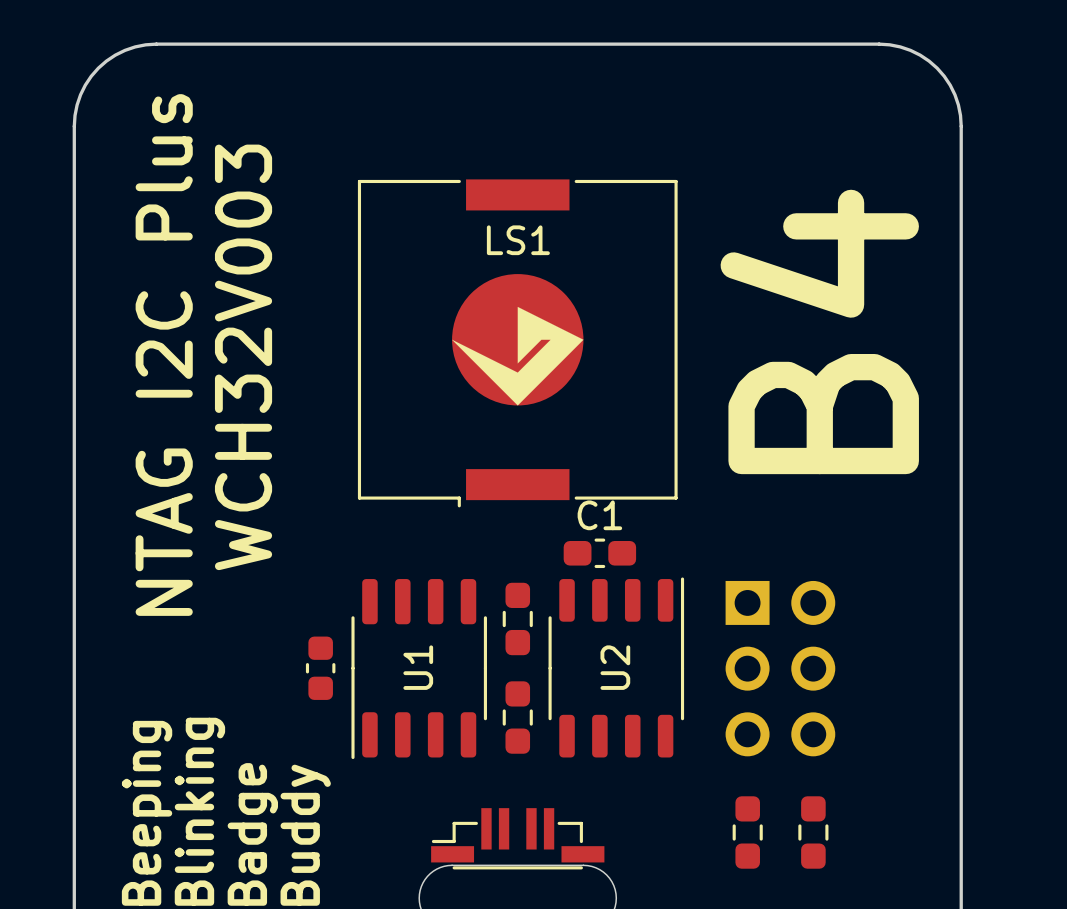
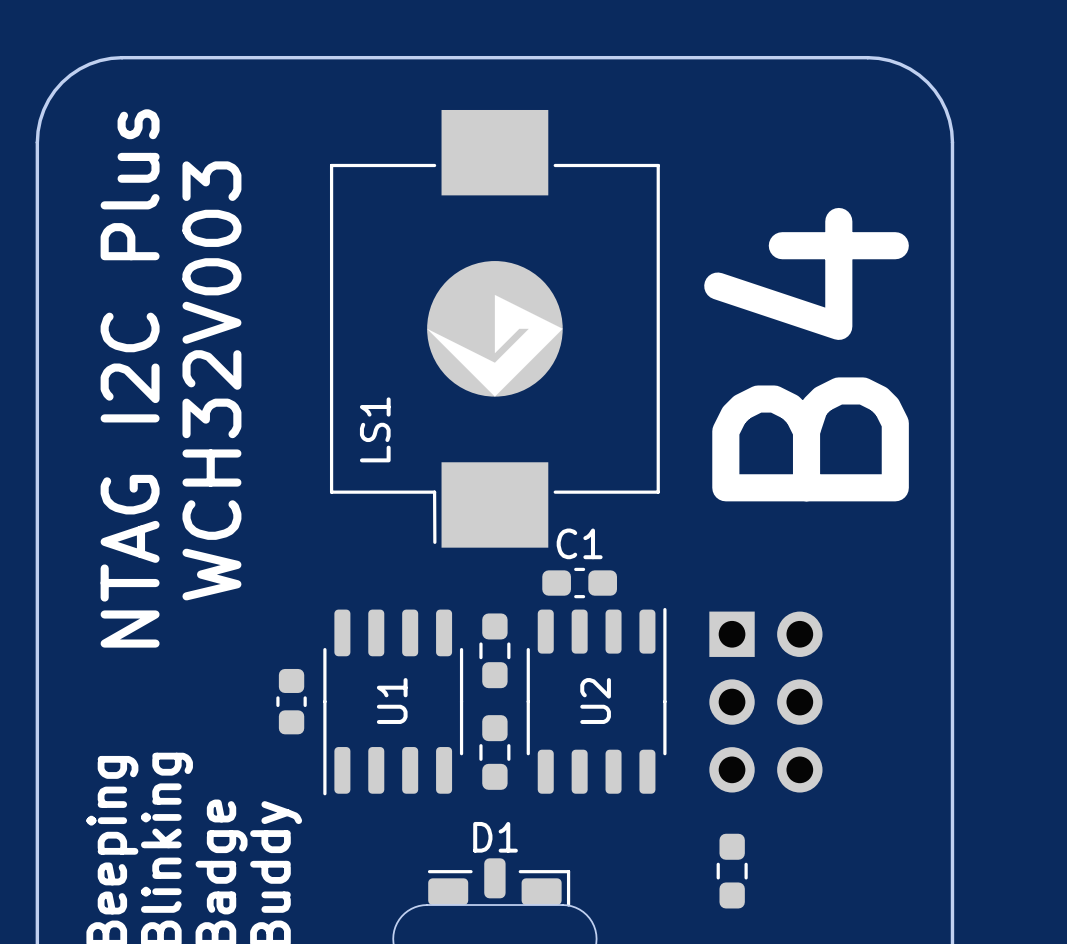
LS1 footprint: [357, 179, 678, 508] -> [329, 109, 660, 548]
LS1 name position: LS1 (518, 240) -> LS1 (375, 429)
part position: (517, 339) -> (494, 328)
part: (813, 832) -> none
part: (517, 838) -> none
D1: none -> (499, 882)

